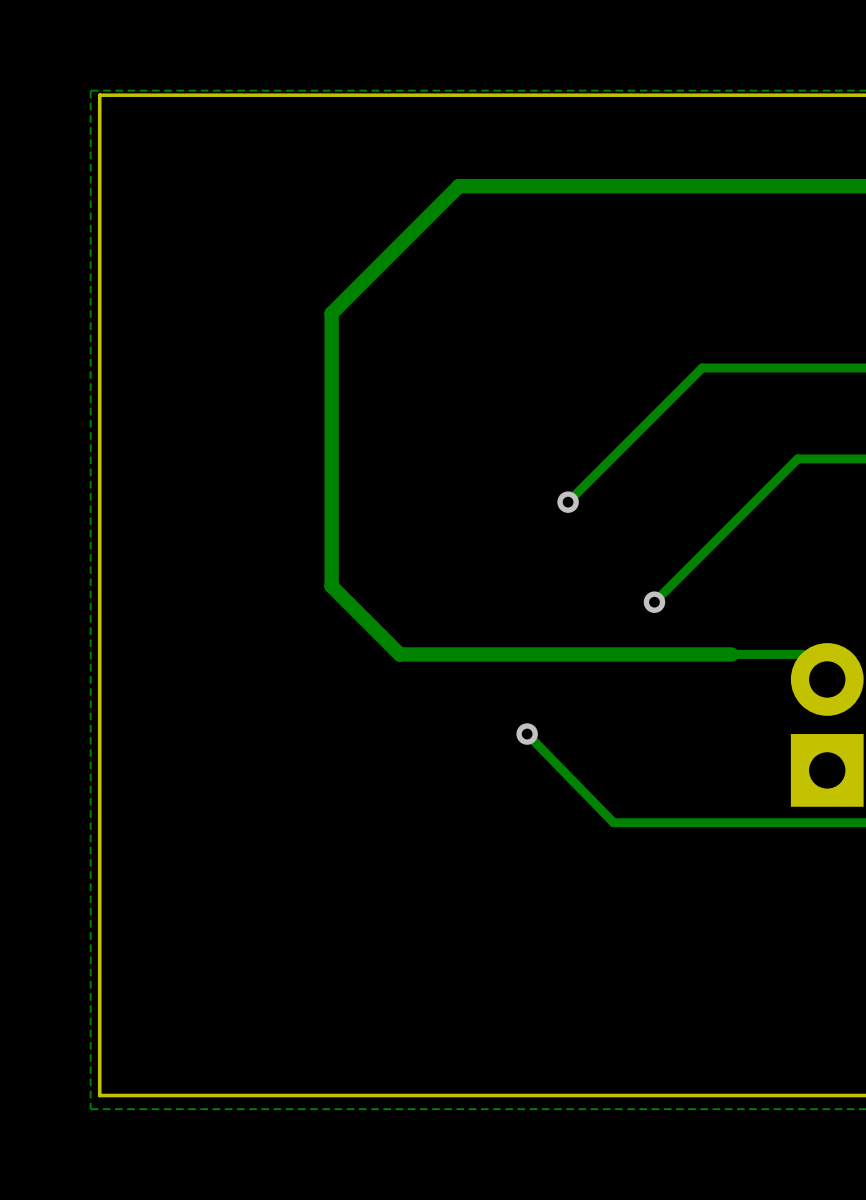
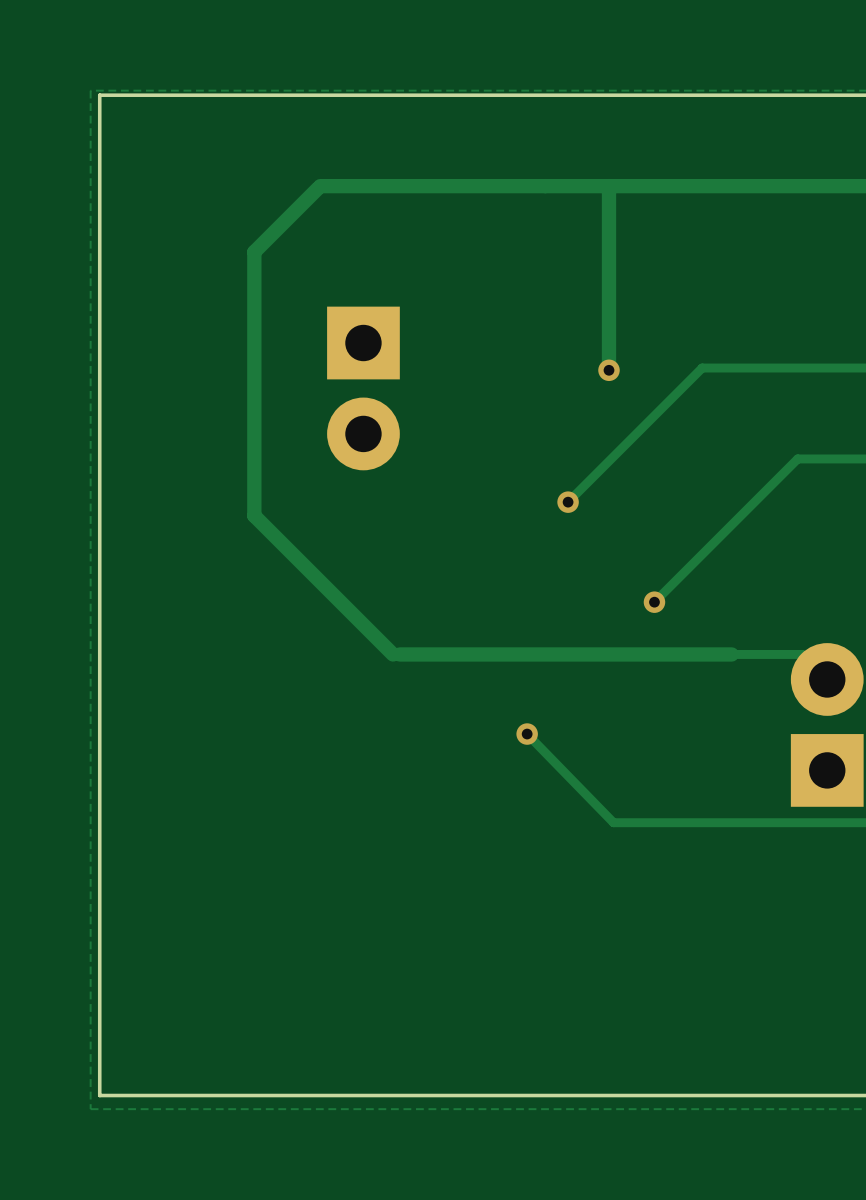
track: (458, 186) (331, 313) (331, 586) (399, 654) -> (458, 186) (320, 186) (254, 252) (254, 515) (393, 654) (399, 654)
track: none -> (609, 186) (609, 370)
via: none -> (609, 370)
part: none -> (363, 388)

